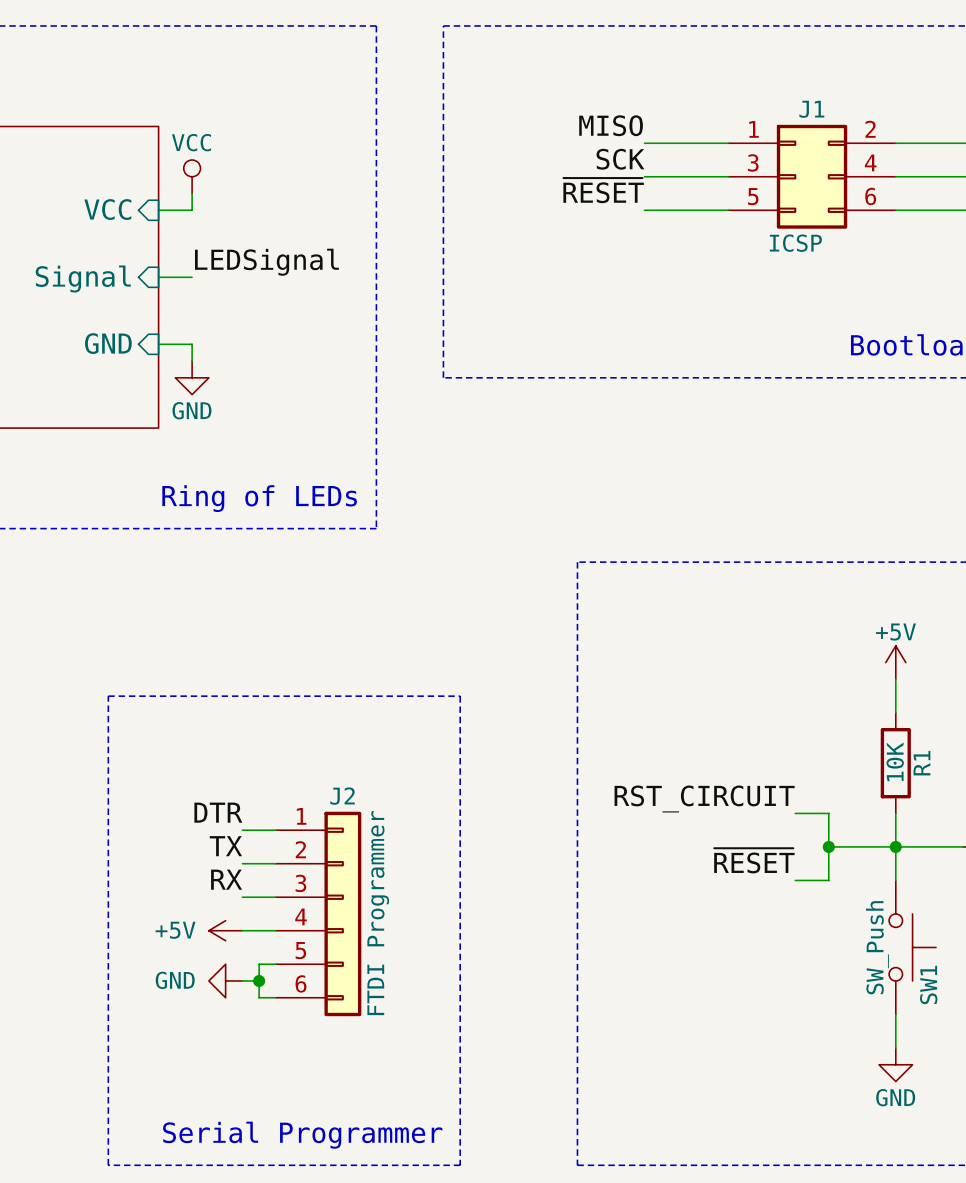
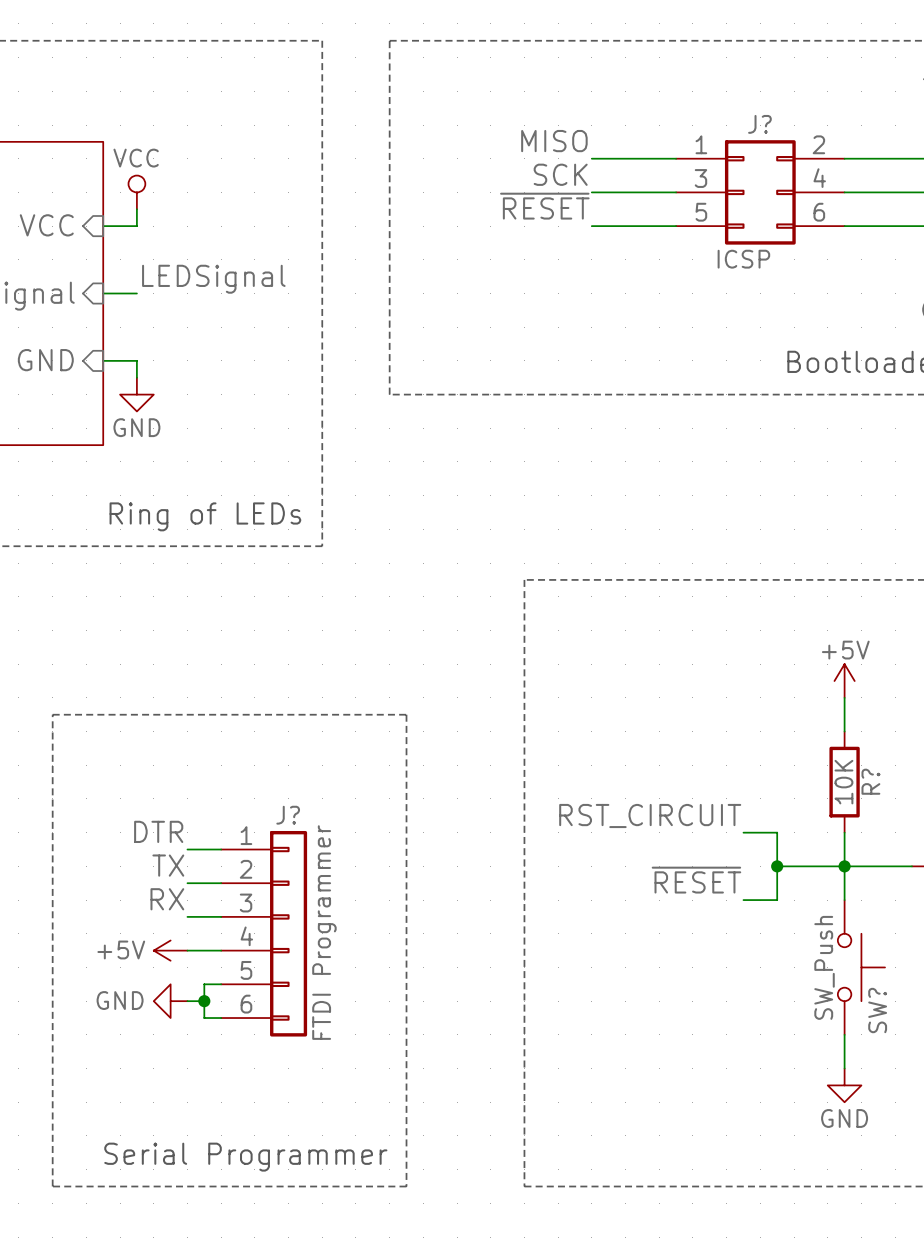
J1 name: J1 (811, 109) -> J? (759, 124)
R1 name: R1 (921, 763) -> R? (870, 781)
J2 name: J2 (342, 796) -> J? (288, 815)
SW1 name: SW1 (928, 984) -> SW? (877, 1010)

